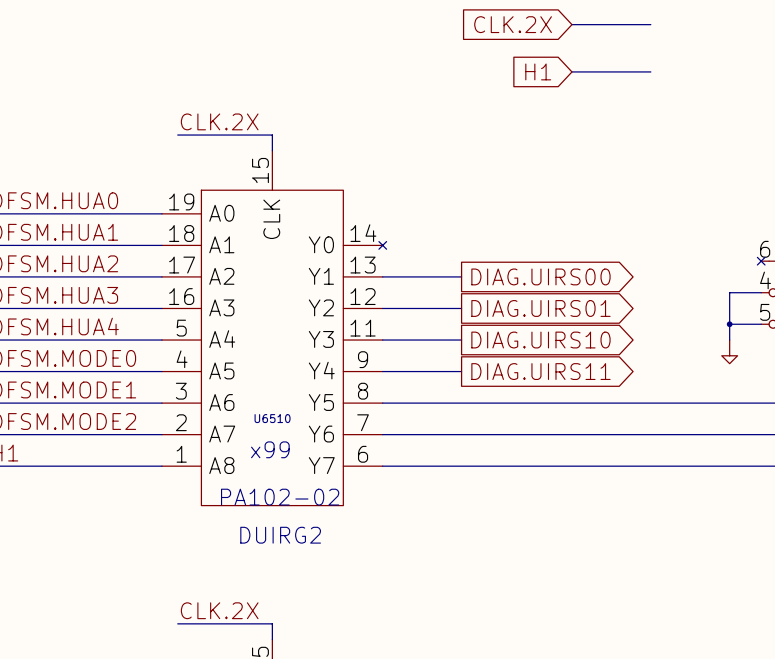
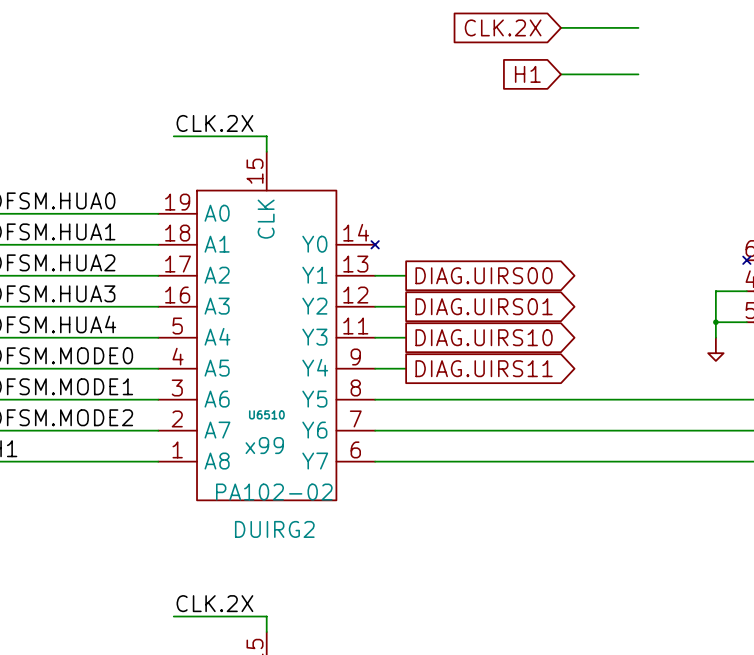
wire: (414, 276) (461, 276) -> none
global label position: DIAG.UIRS00 (540, 276) -> DIAG.UIRS00 (484, 275)
wire: (414, 308) (461, 308) -> none
global label position: DIAG.UIRS01 (540, 308) -> DIAG.UIRS01 (484, 306)
wire: (414, 340) (461, 340) -> none
global label position: DIAG.UIRS10 (540, 340) -> DIAG.UIRS10 (484, 337)
wire: (414, 371) (461, 371) -> none
global label position: DIAG.UIRS11 (540, 371) -> DIAG.UIRS11 (484, 368)

